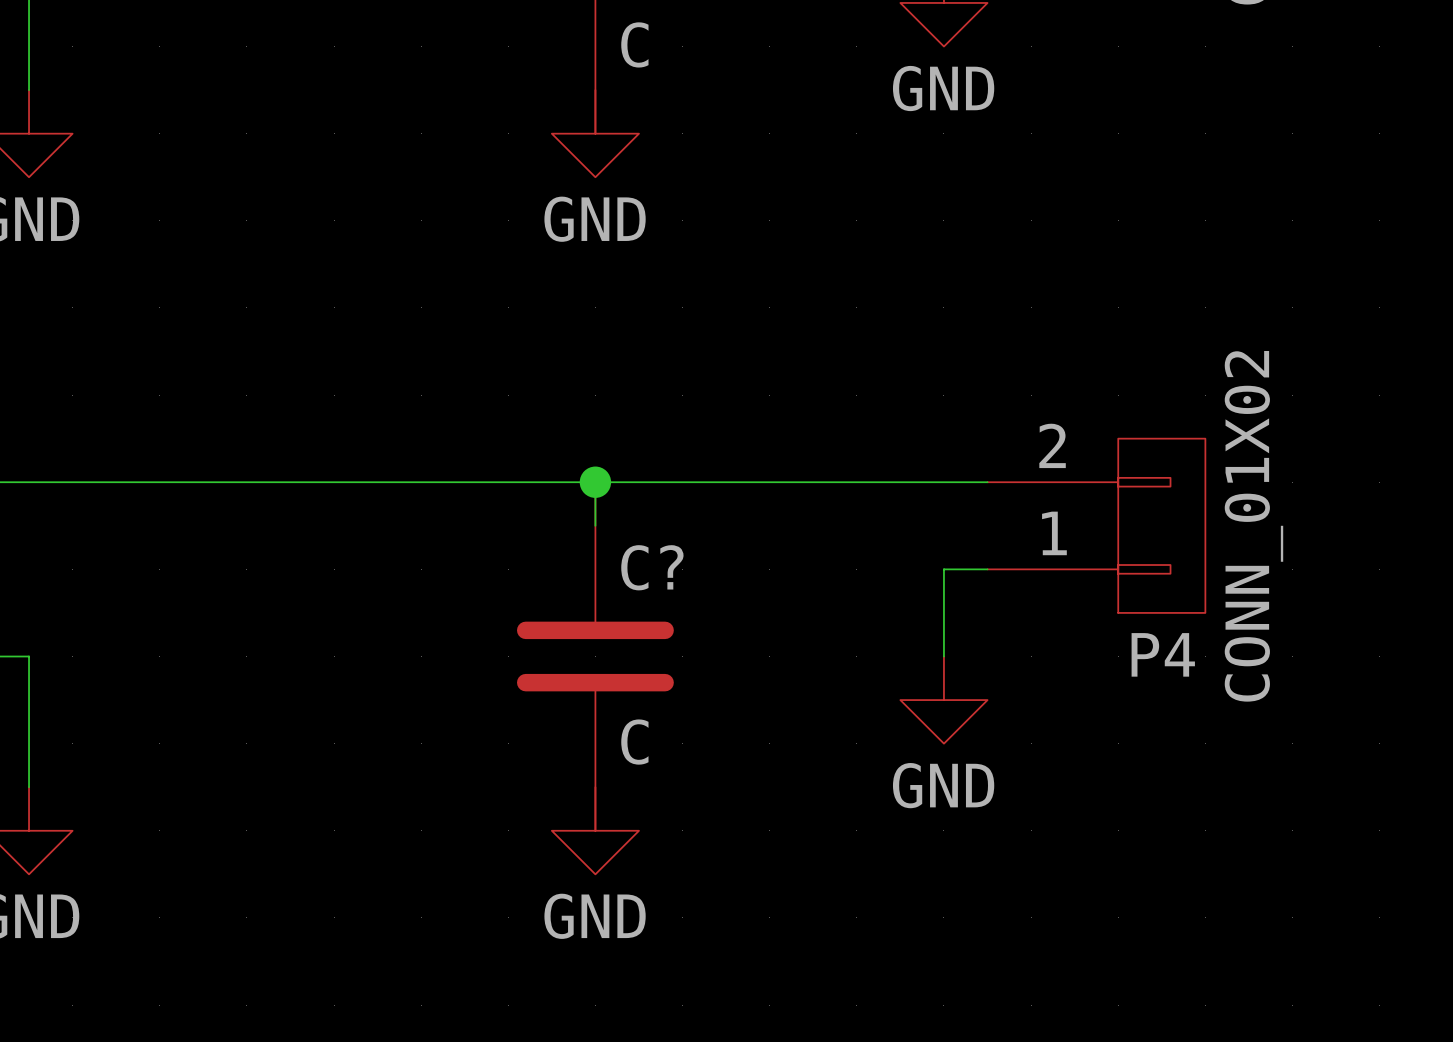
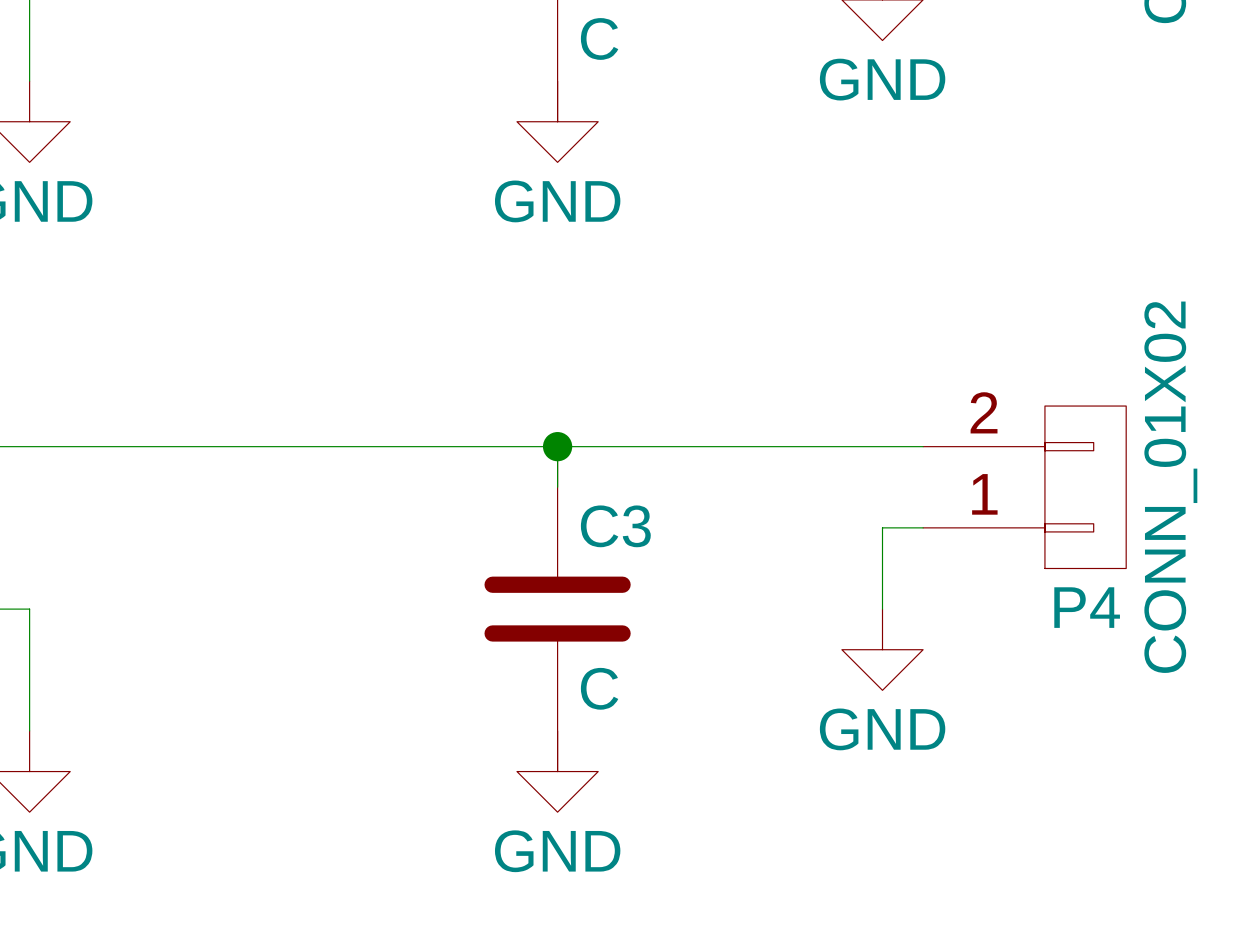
C? name: C? (652, 567) -> C3 (615, 526)

